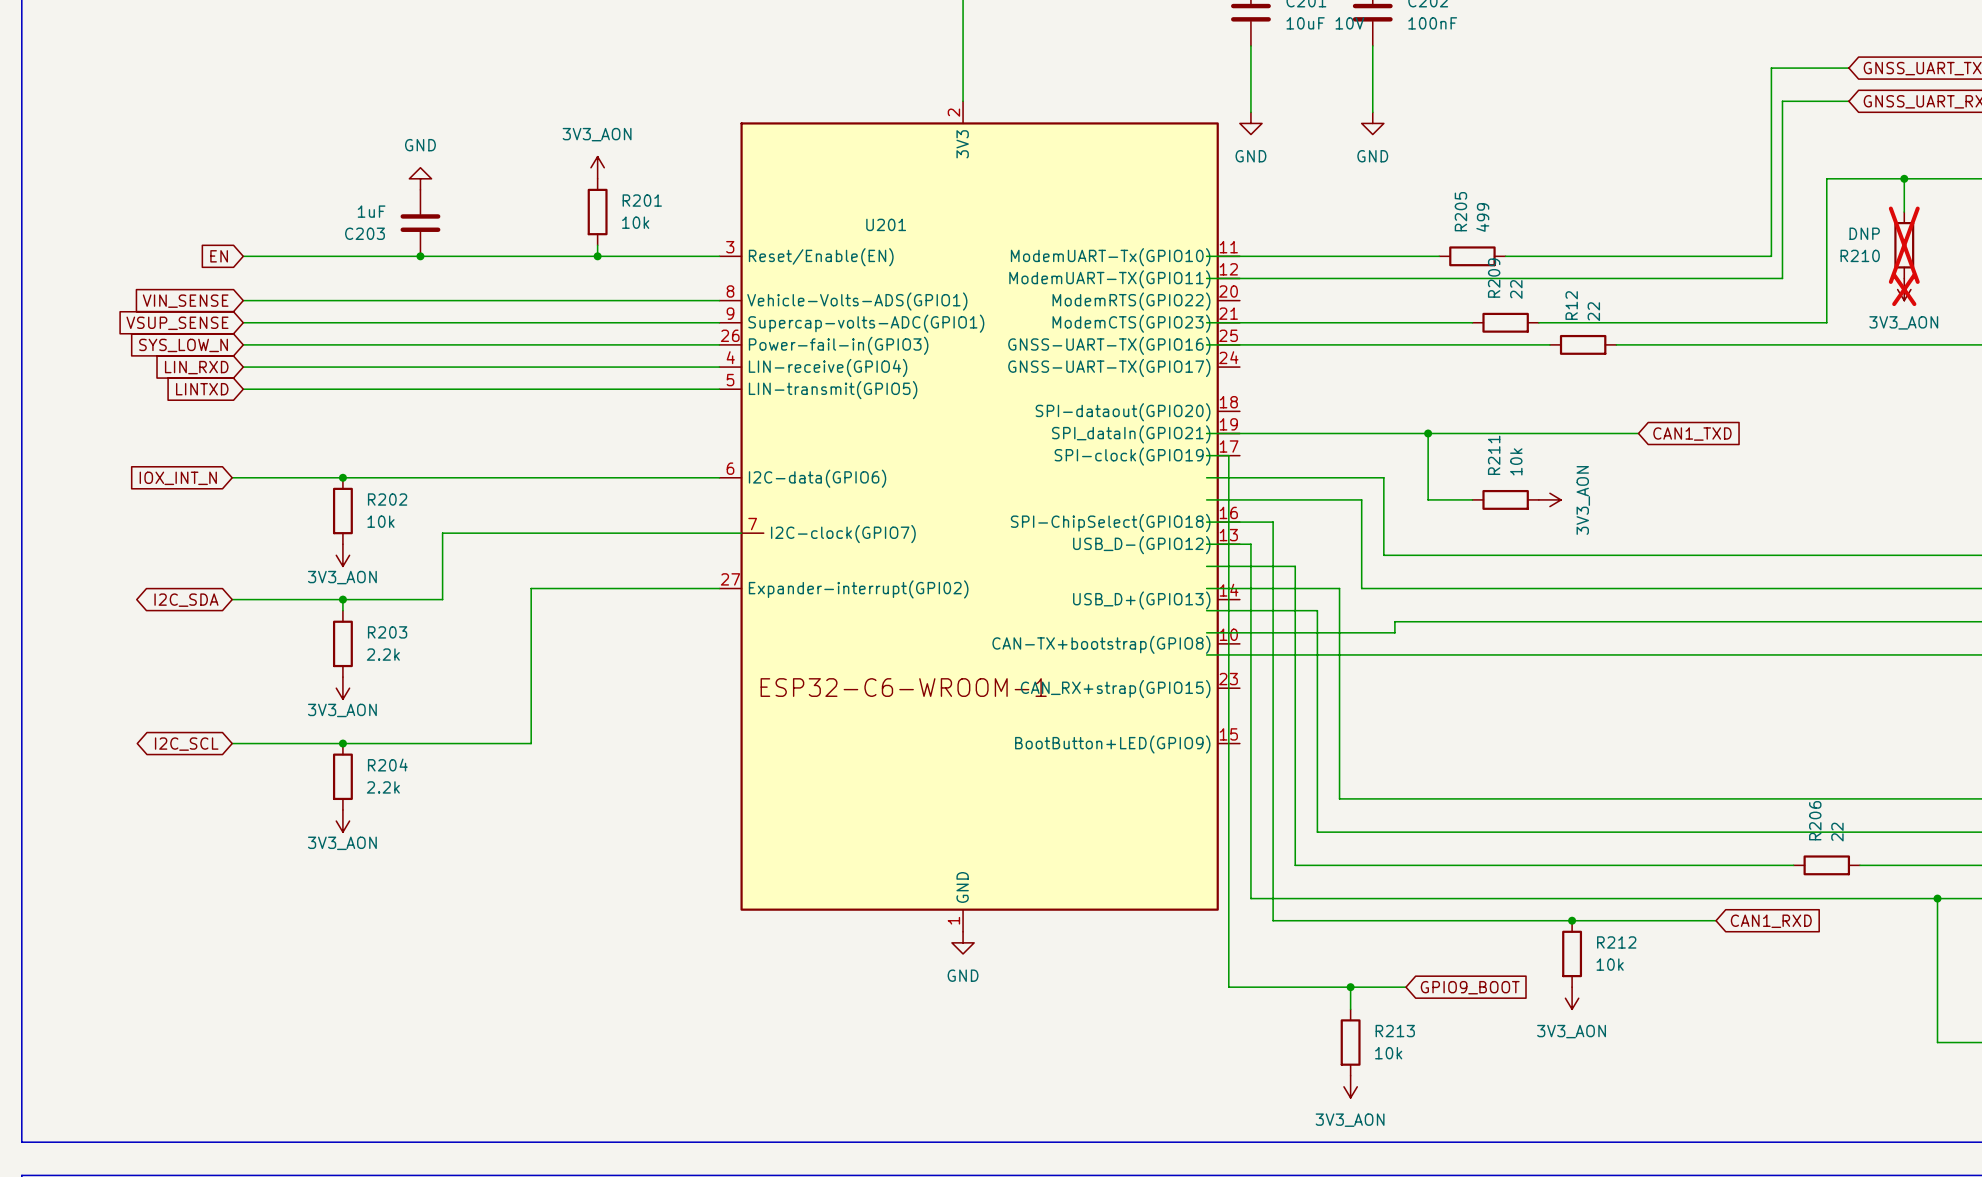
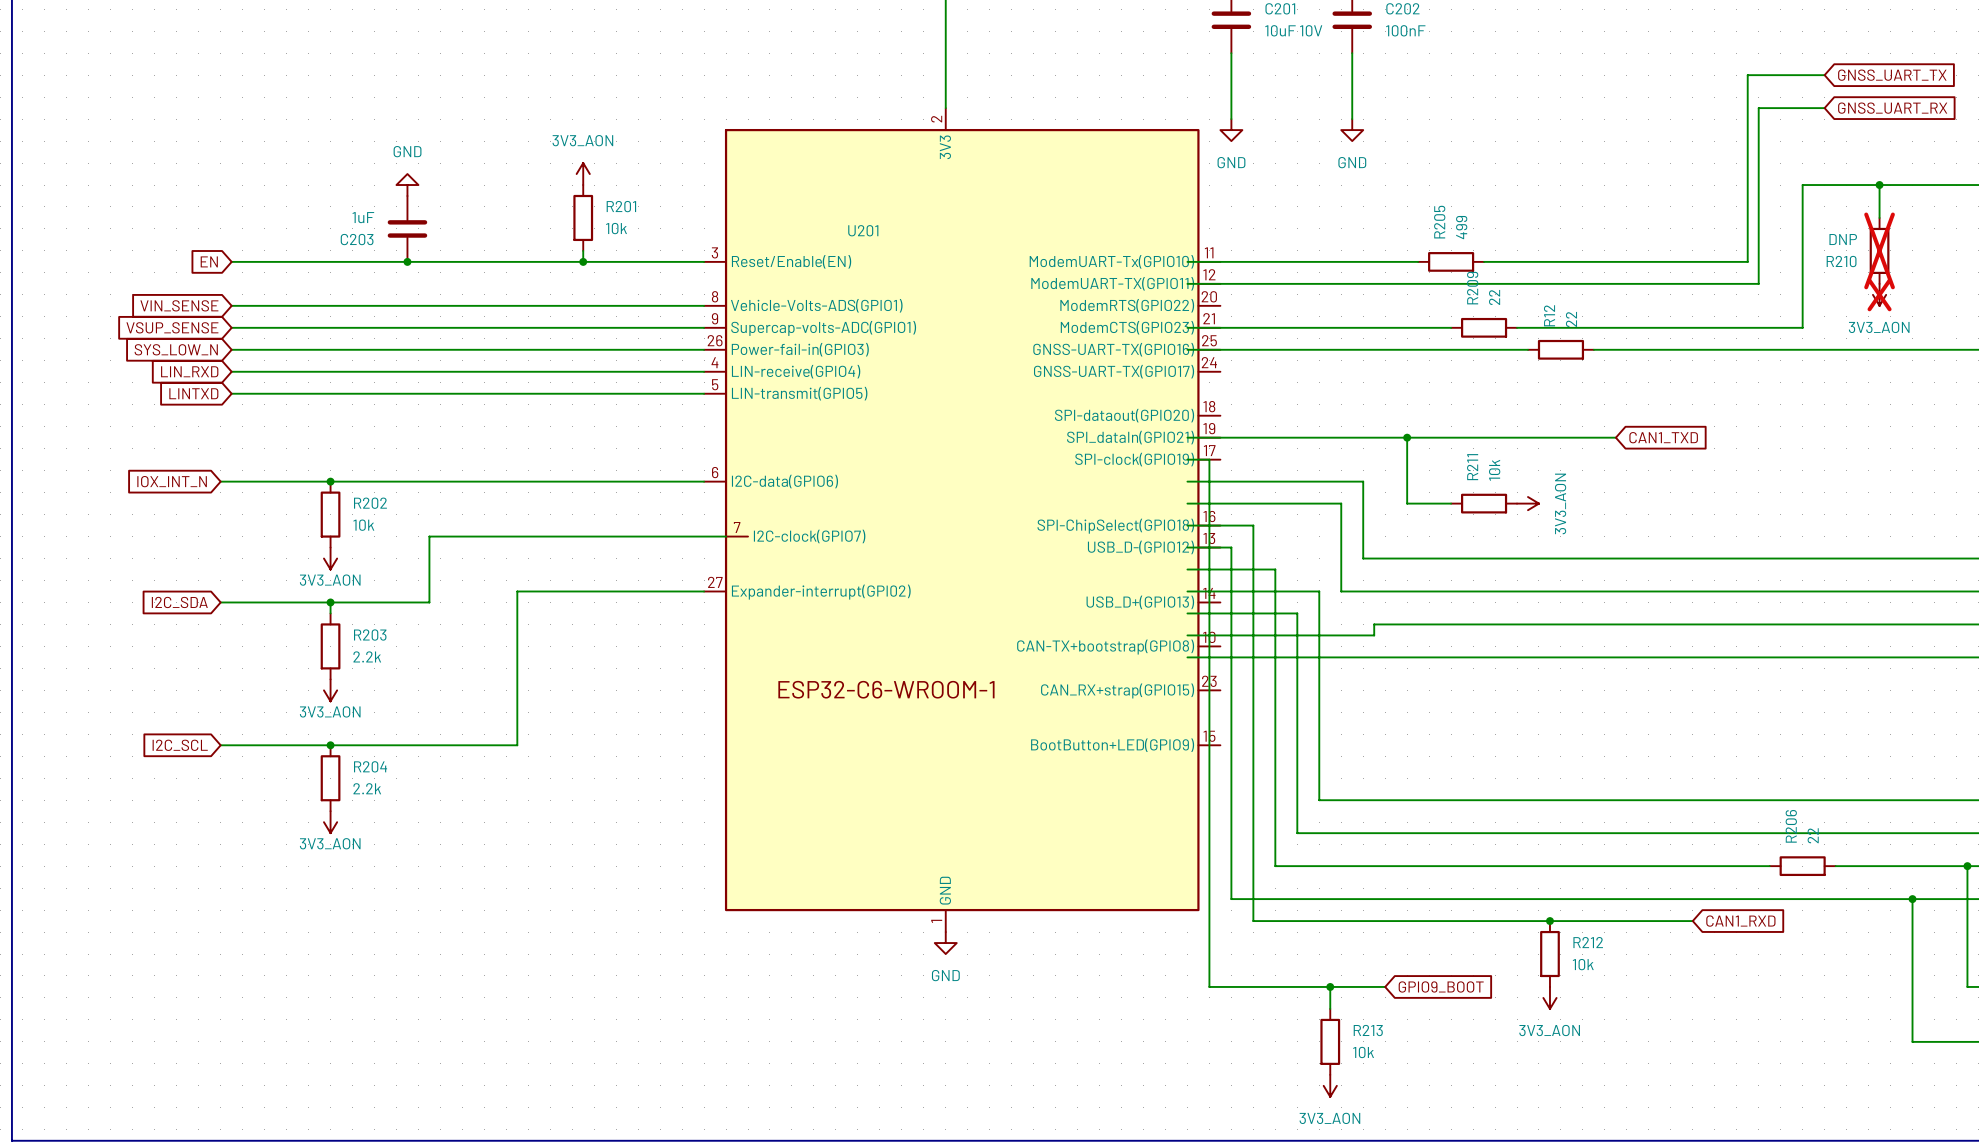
global label shape: bidirectional (186, 600) -> input (179, 602)
global label shape: bidirectional (186, 744) -> input (180, 745)

